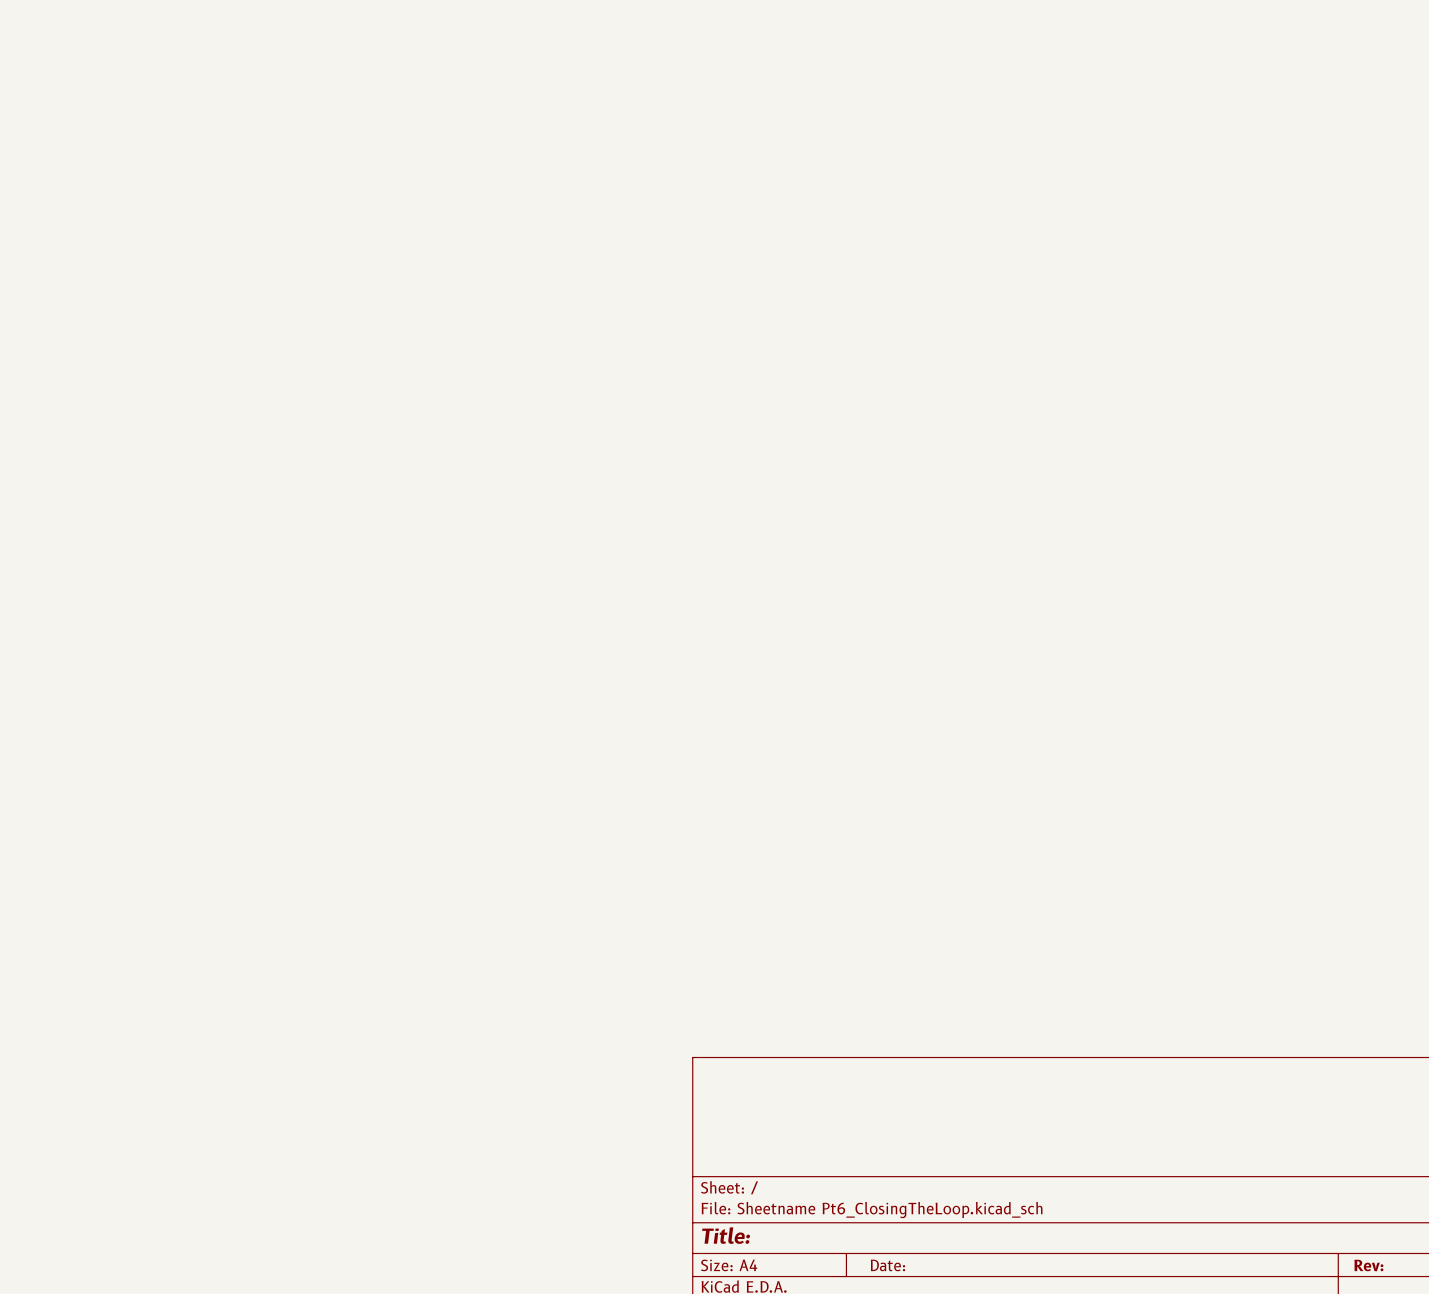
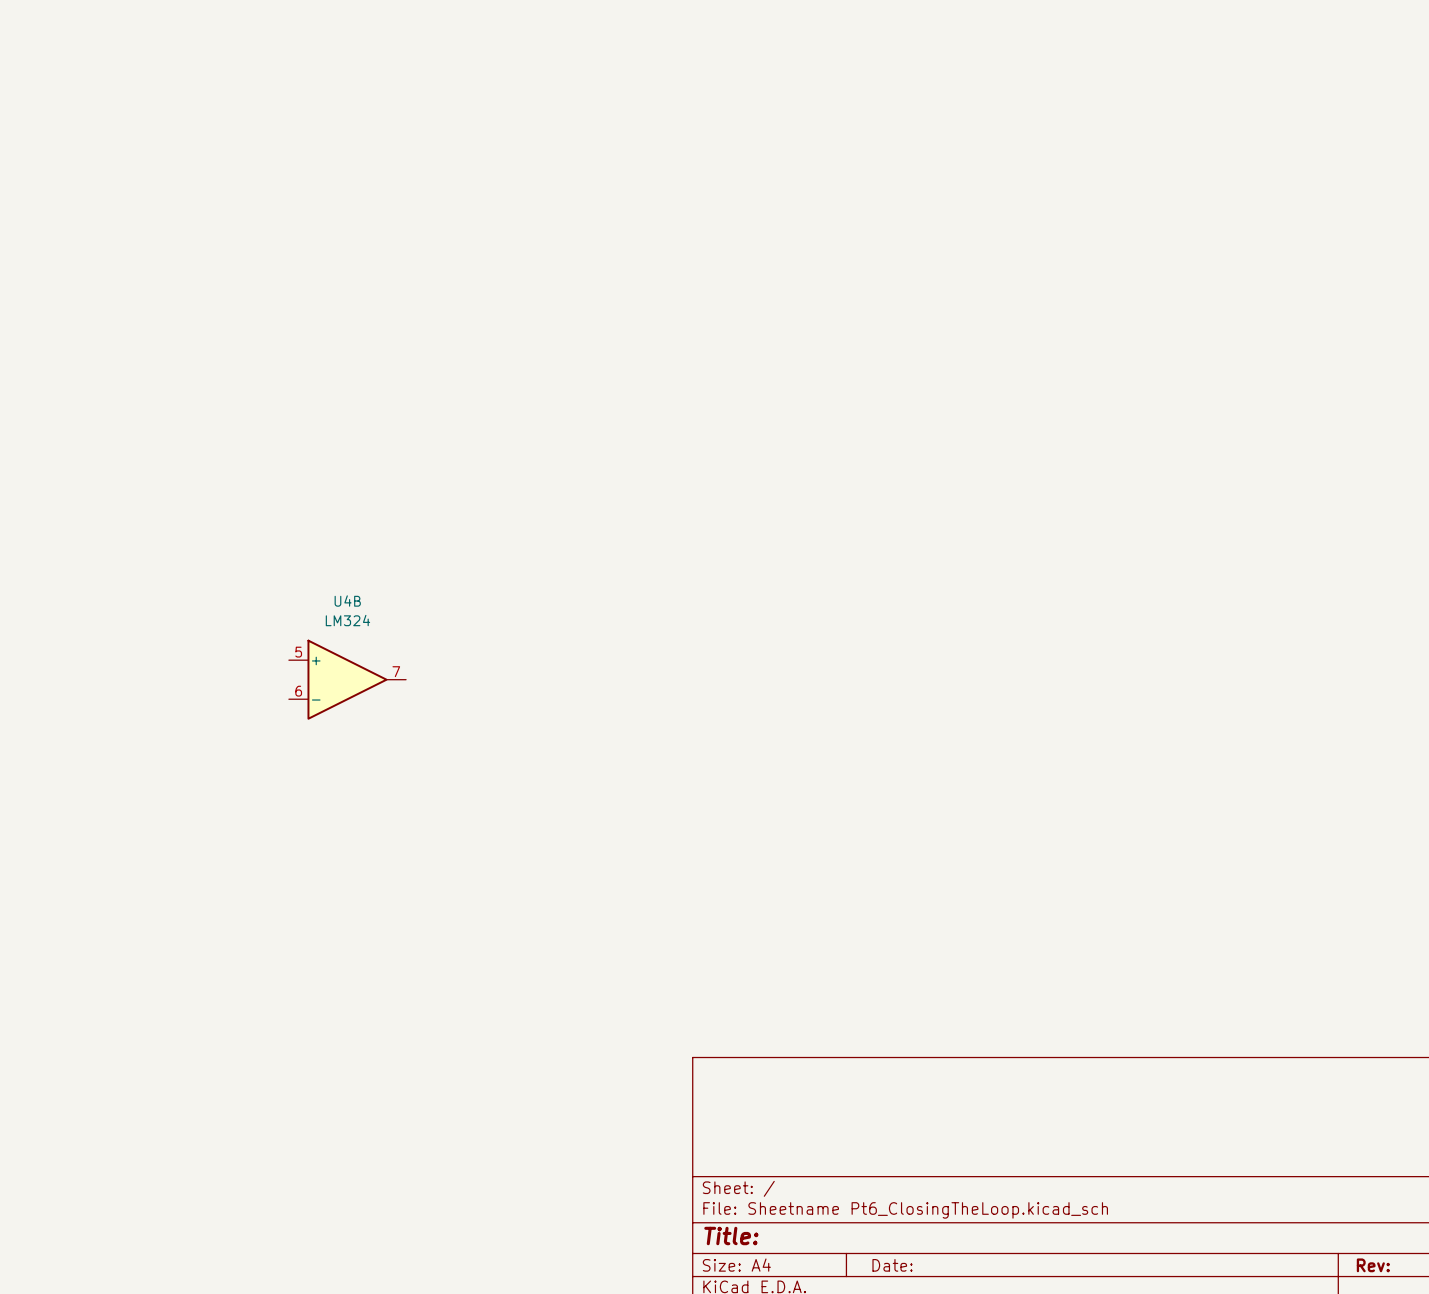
U4B: none -> LM324 (347, 679)

